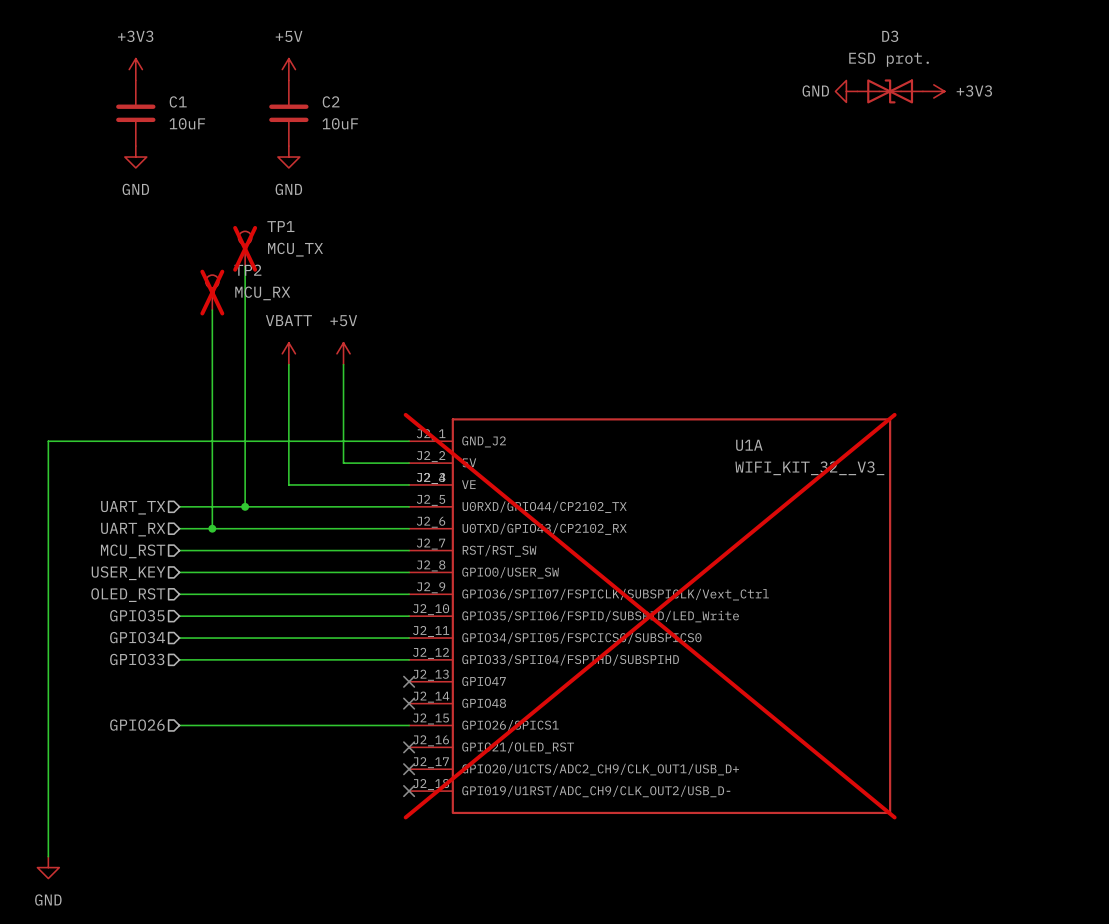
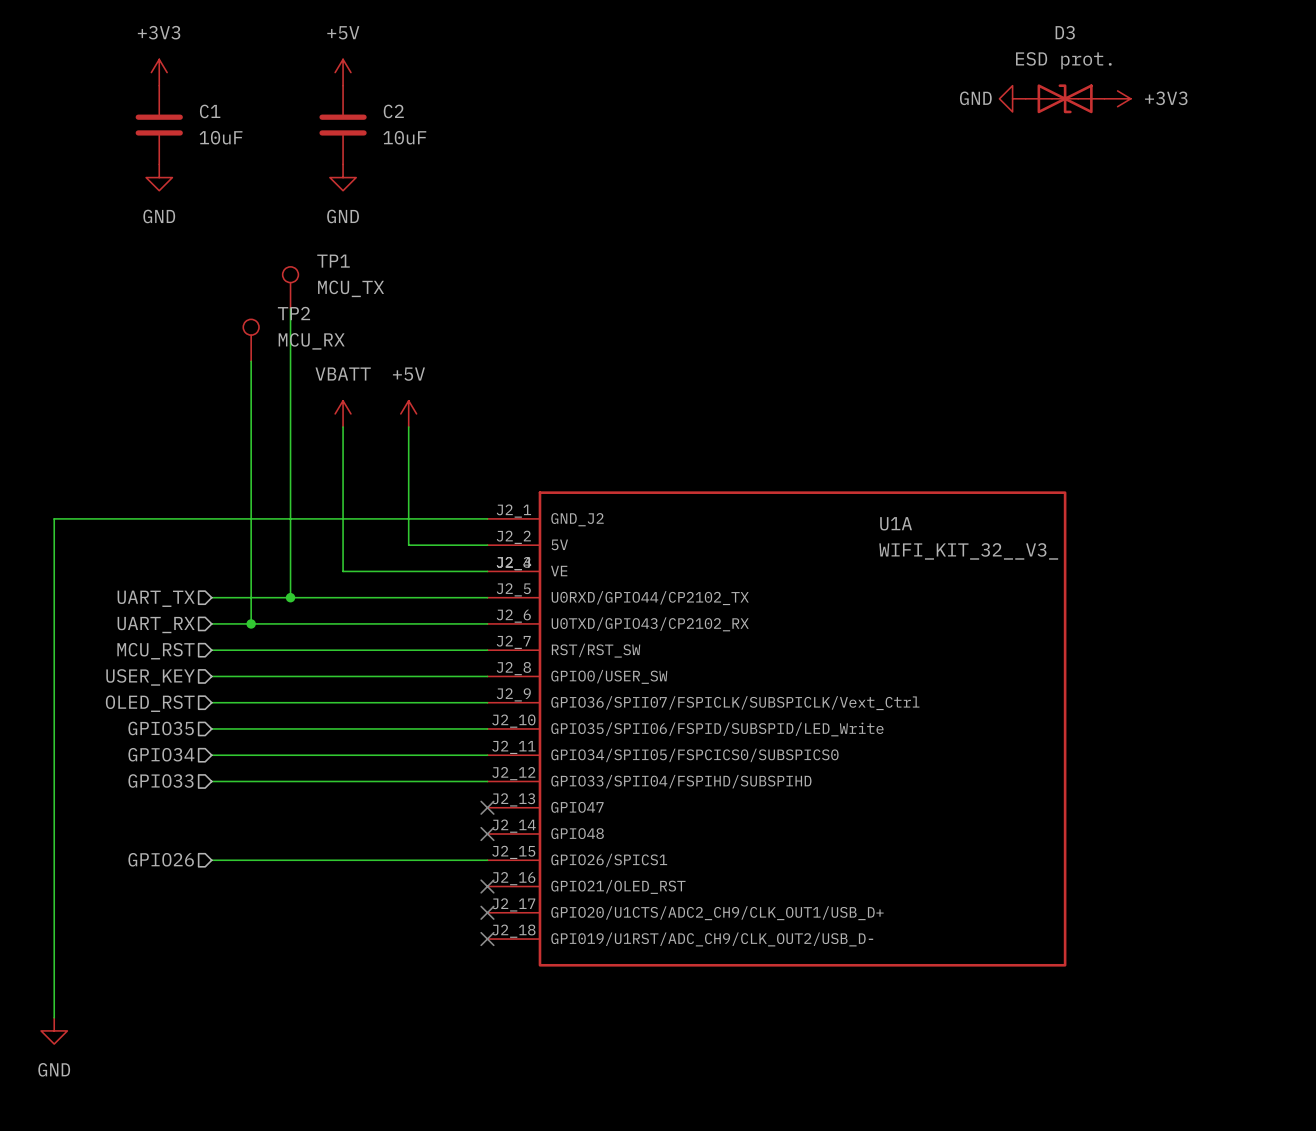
TP1 do-not-place cross: (245, 248) -> none
TP2 do-not-place cross: (212, 292) -> none
U1A do-not-place cross: (650, 616) -> none

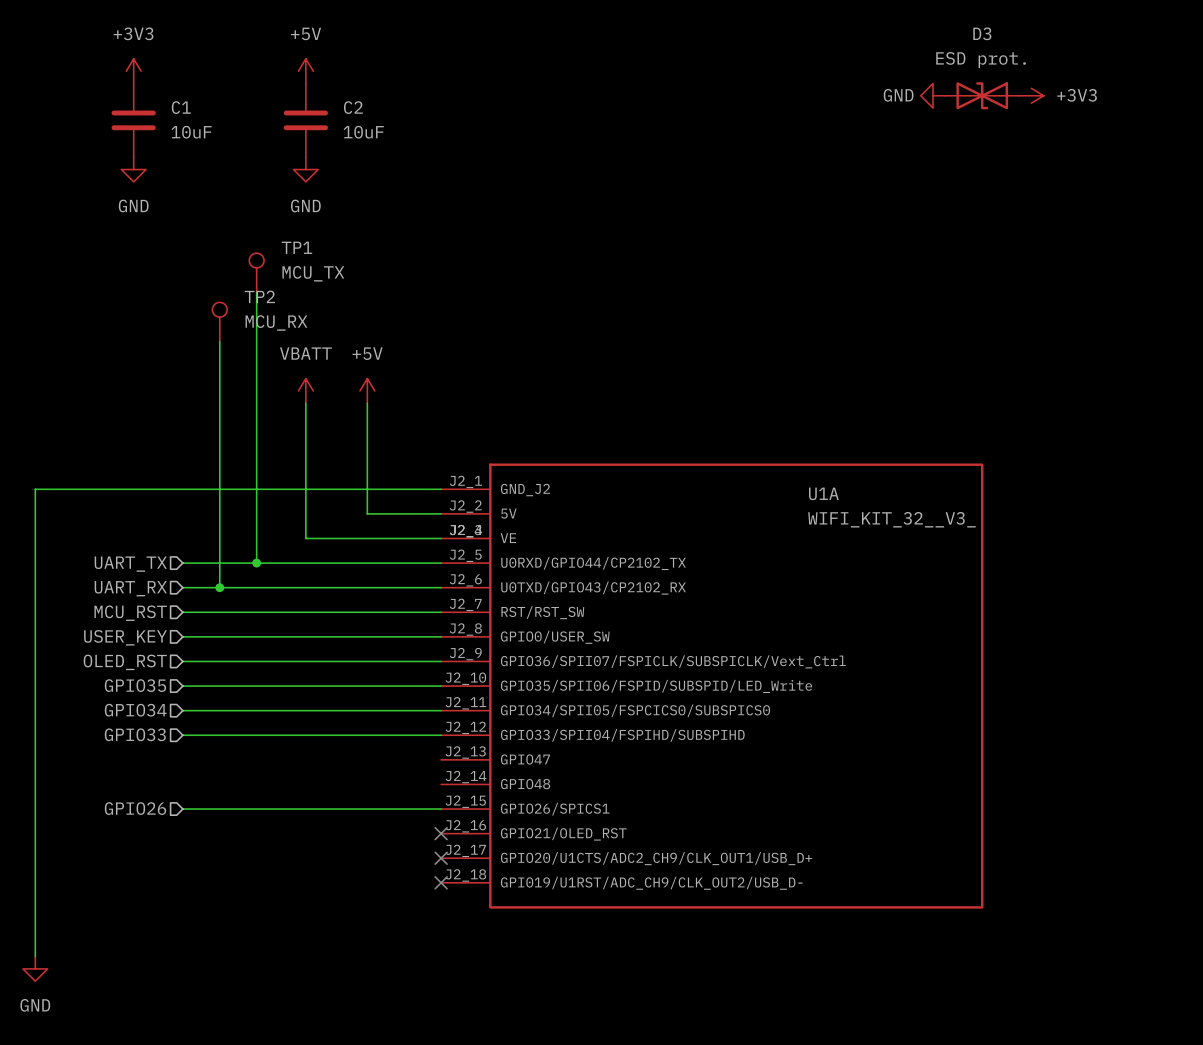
no-connect mark: (487, 807) -> none
no-connect mark: (487, 834) -> none

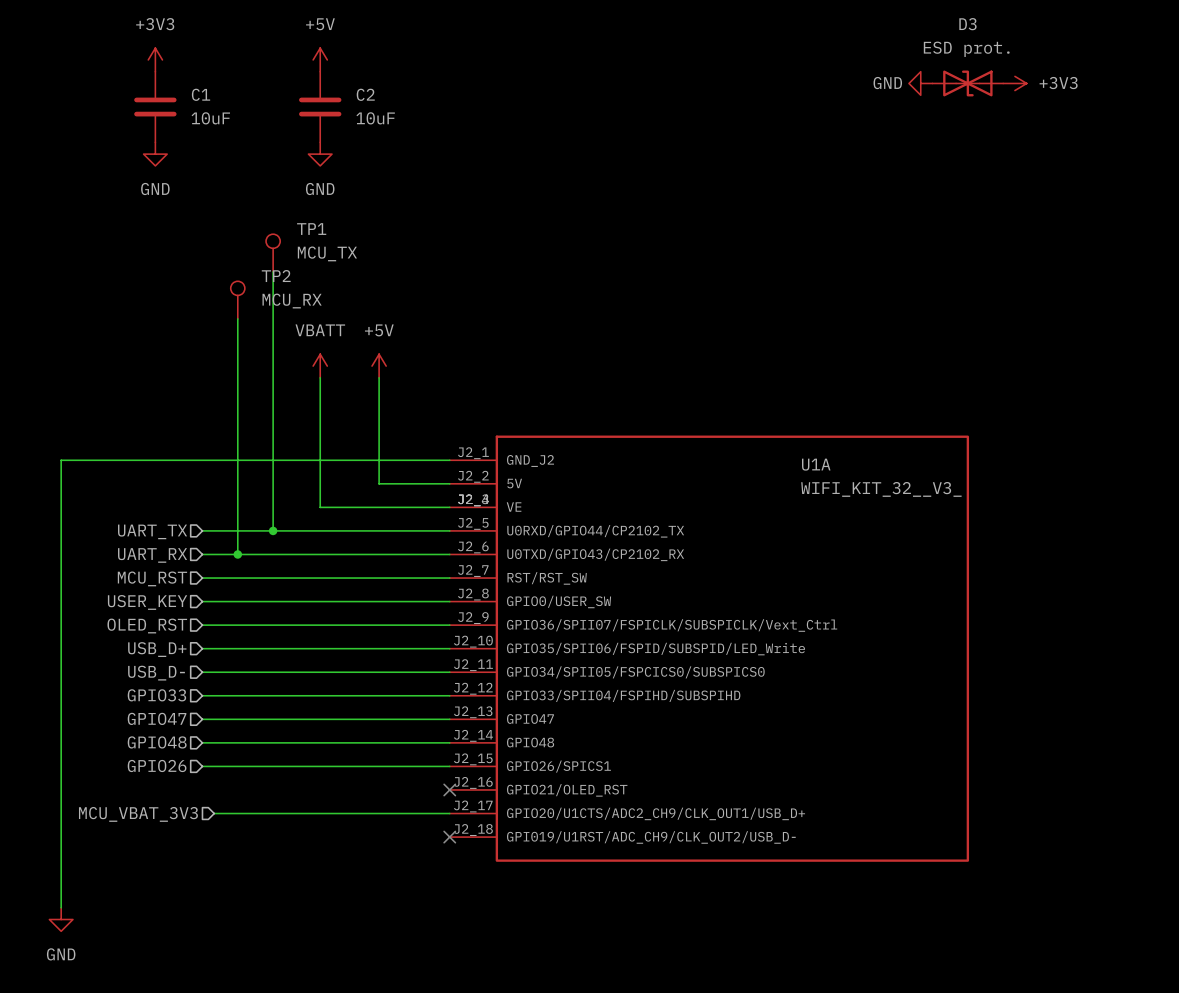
hierarchical label: GPIO35 (135, 685) -> USB_D+ (157, 649)
hierarchical label: GPIO34 (135, 710) -> USB_D- (156, 673)
hierarchical label: none -> GPIO47 (157, 718)
wire: none -> (202, 719) (449, 719)
hierarchical label: none -> GPIO48 (157, 742)
wire: none -> (202, 742) (449, 742)
wire: none -> (214, 813) (449, 813)
no-connect mark: (441, 858) -> none
hierarchical label: none -> MCU_VBAT_3V3 (138, 814)

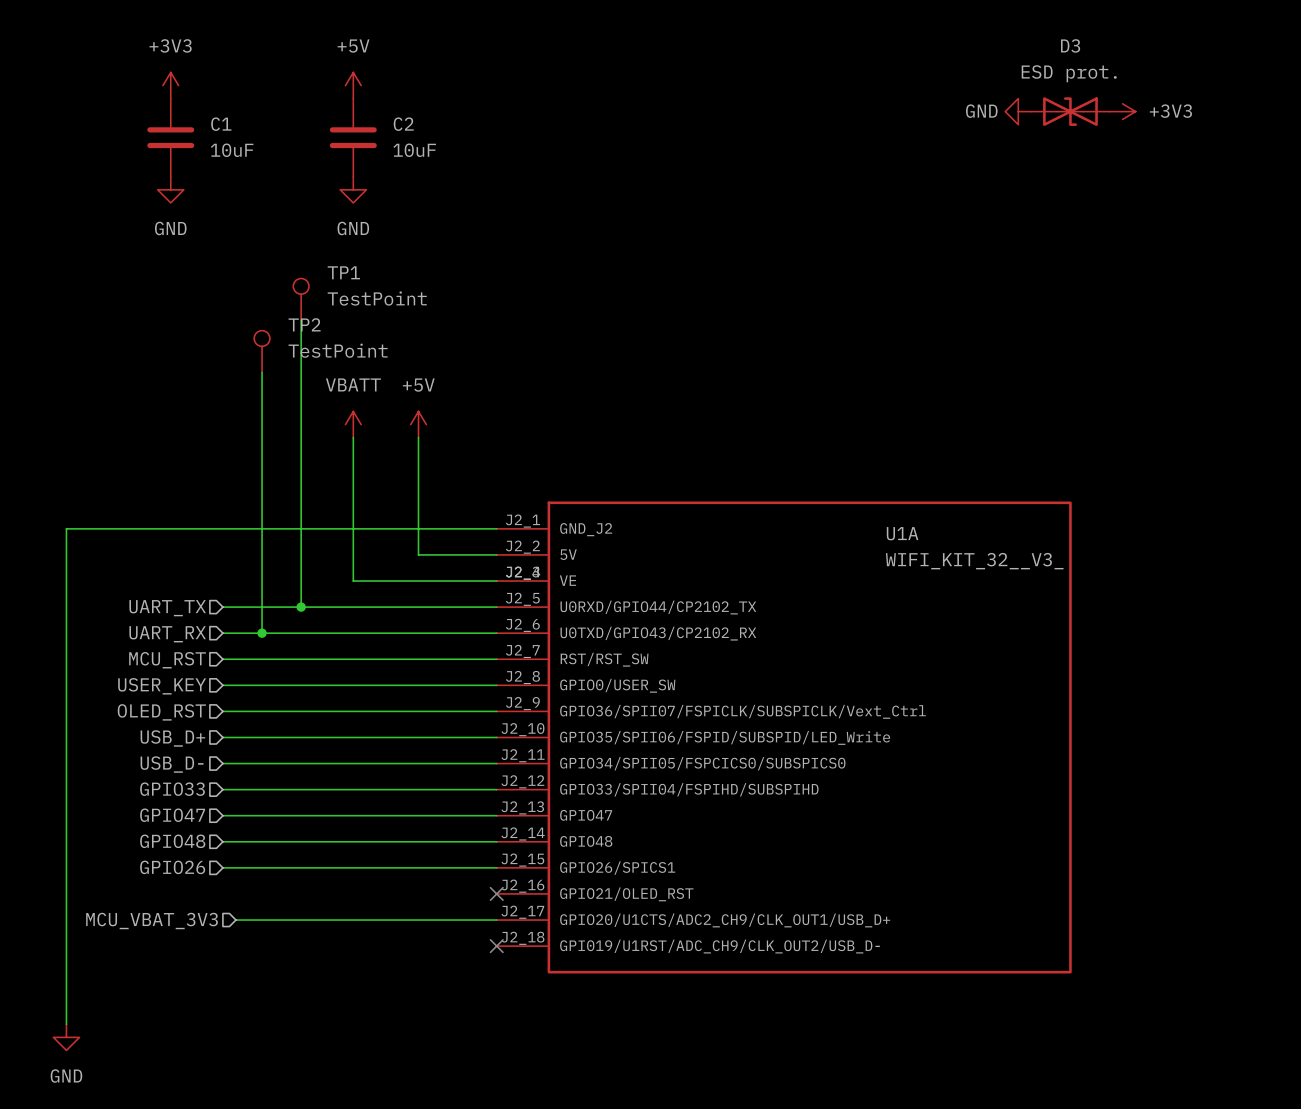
TP1 value: MCU_TX (327, 253) -> TestPoint (377, 298)
TP2 value: MCU_RX (292, 301) -> TestPoint (338, 350)

